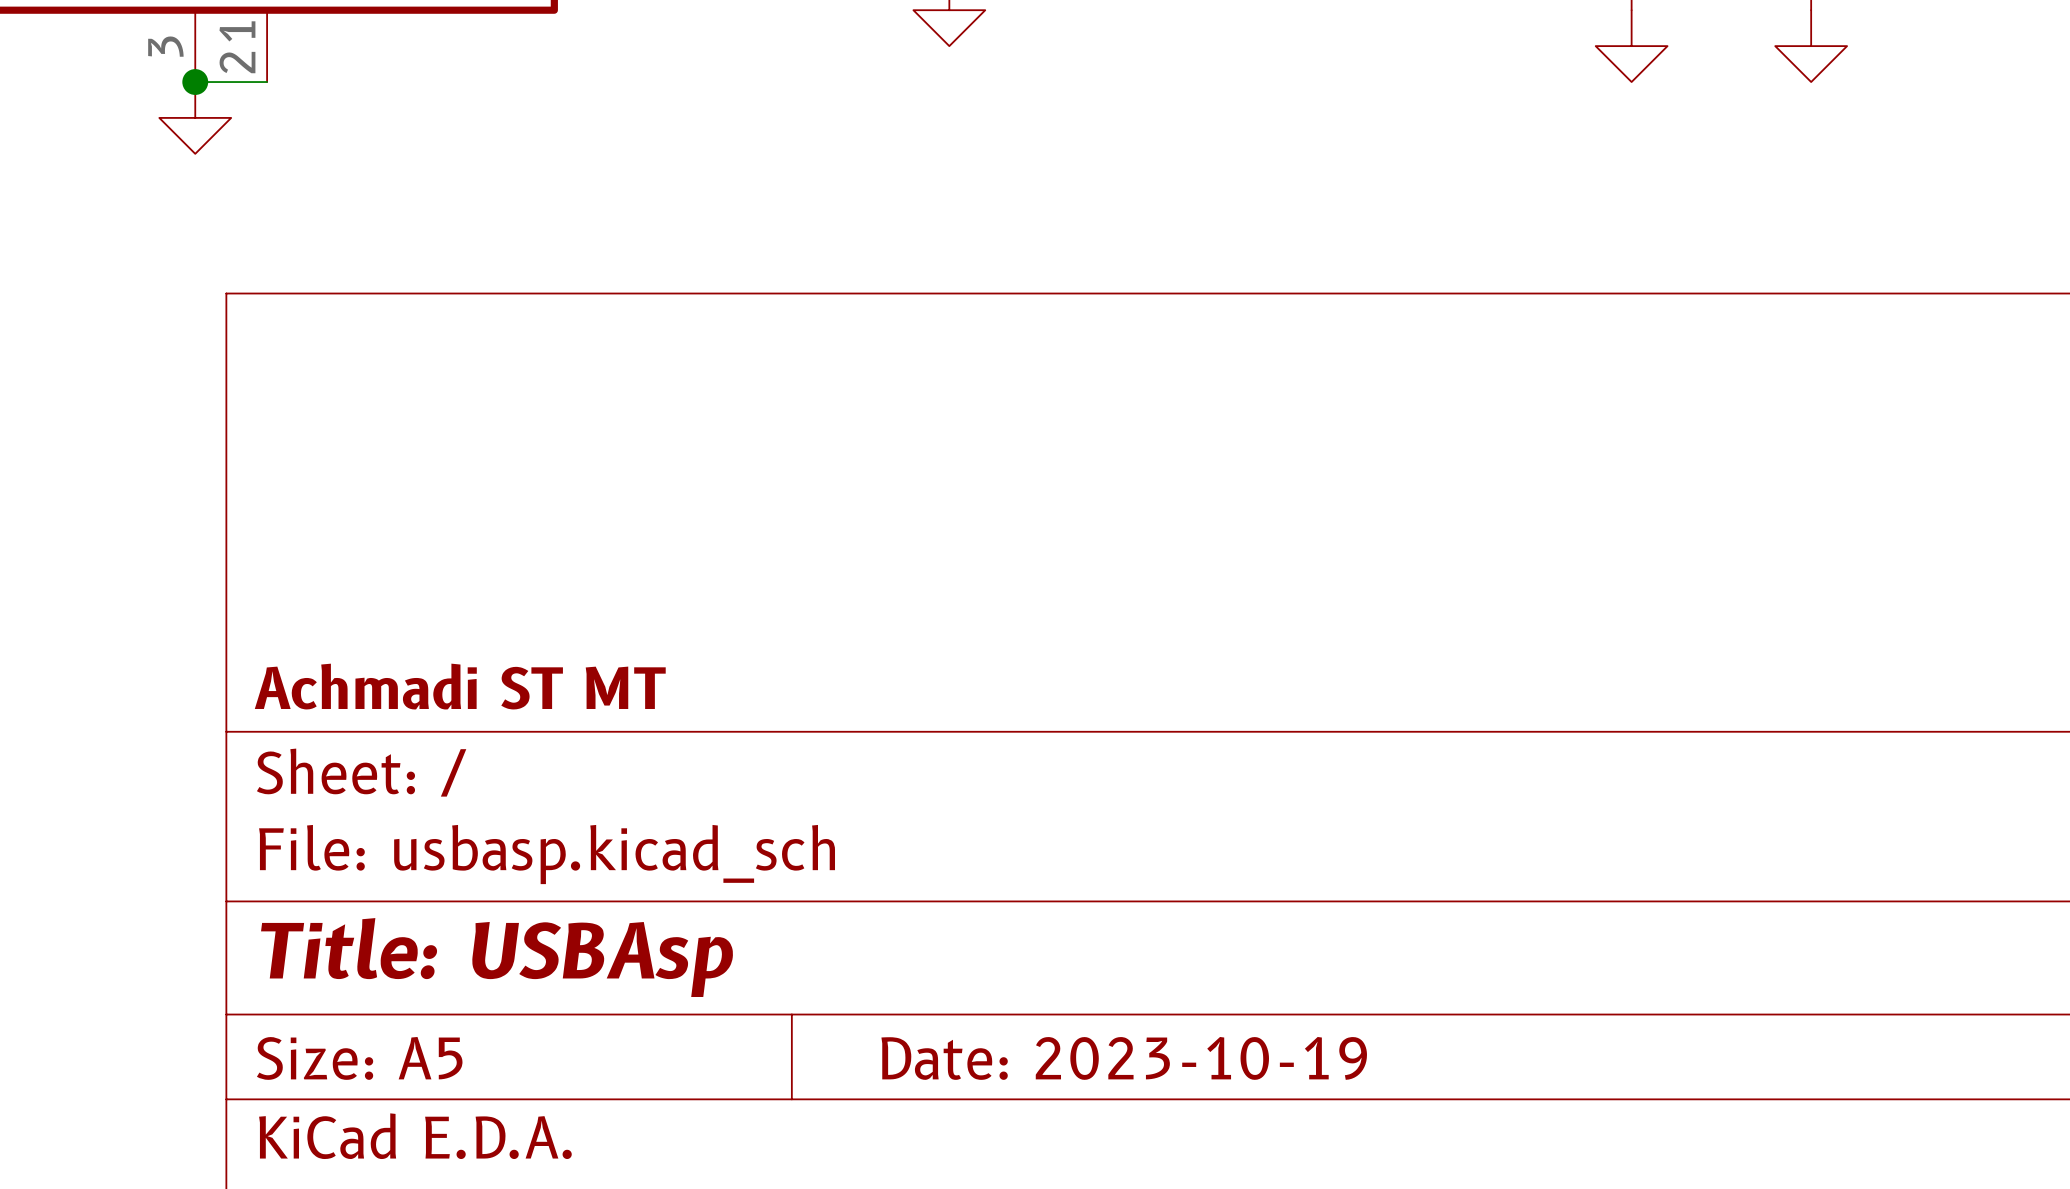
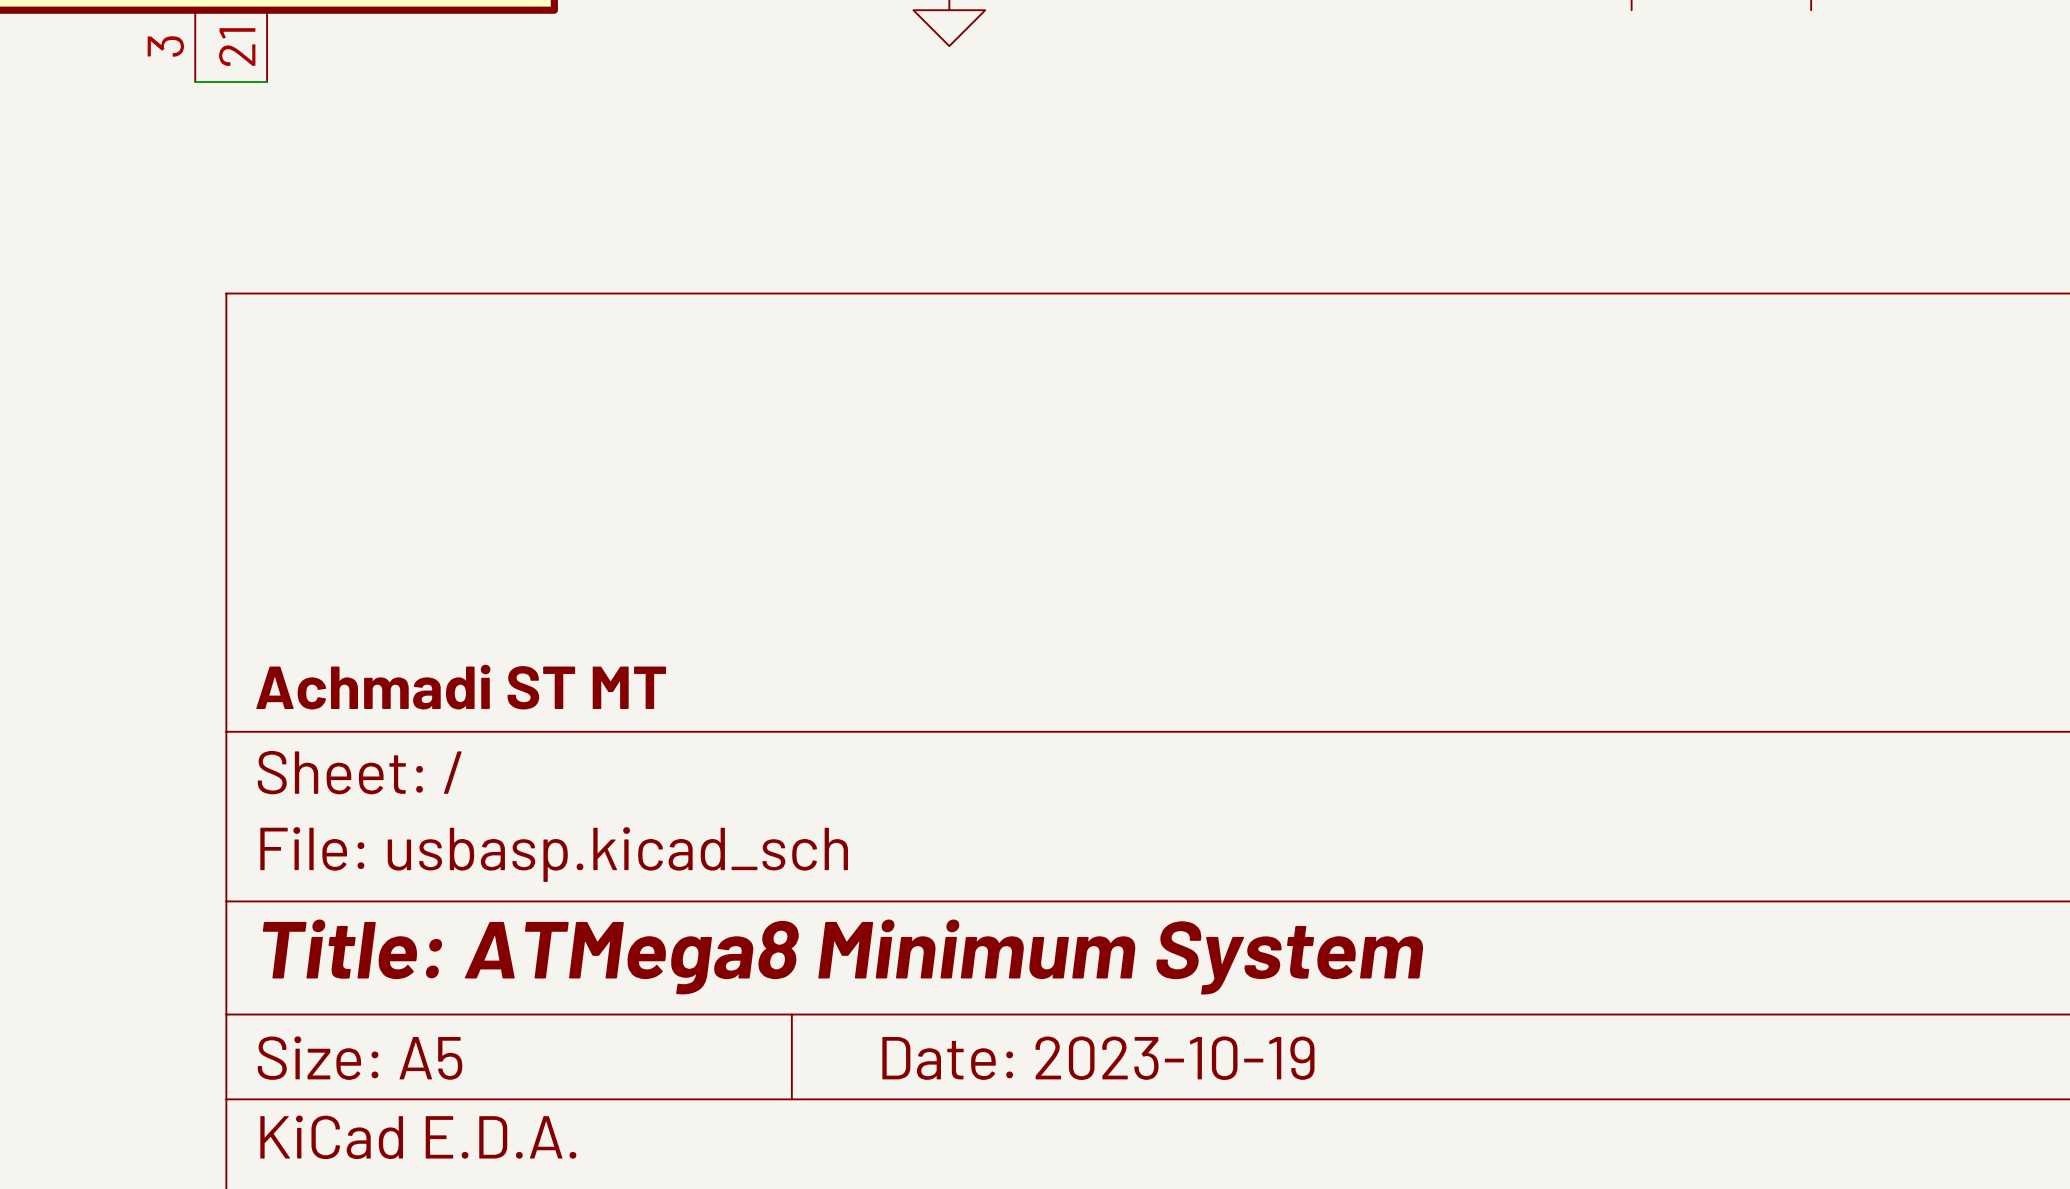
power symbol: (1631, 46) -> none
power symbol: (1811, 46) -> none
junction: (195, 82) -> none
power symbol: (195, 117) -> none
title block: Title: USBAsp (497, 957) -> Title: ATMega8 Minimum System (843, 957)

